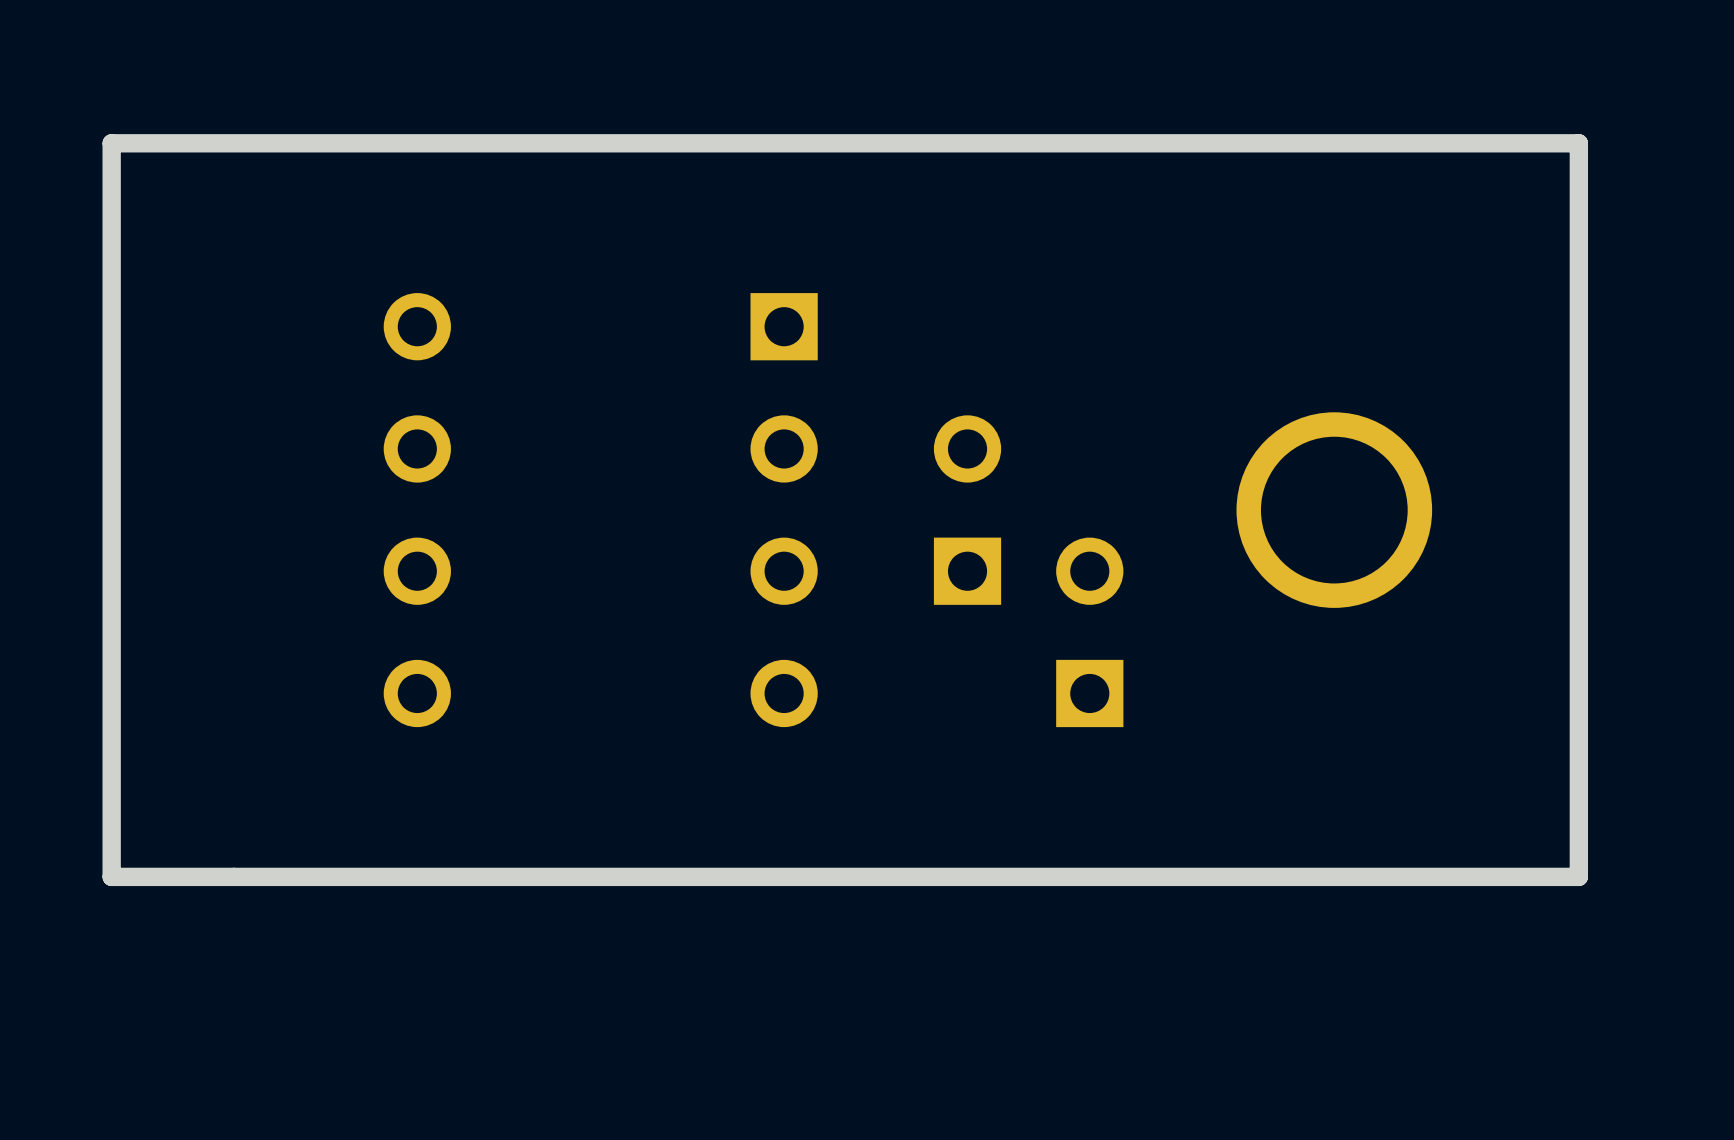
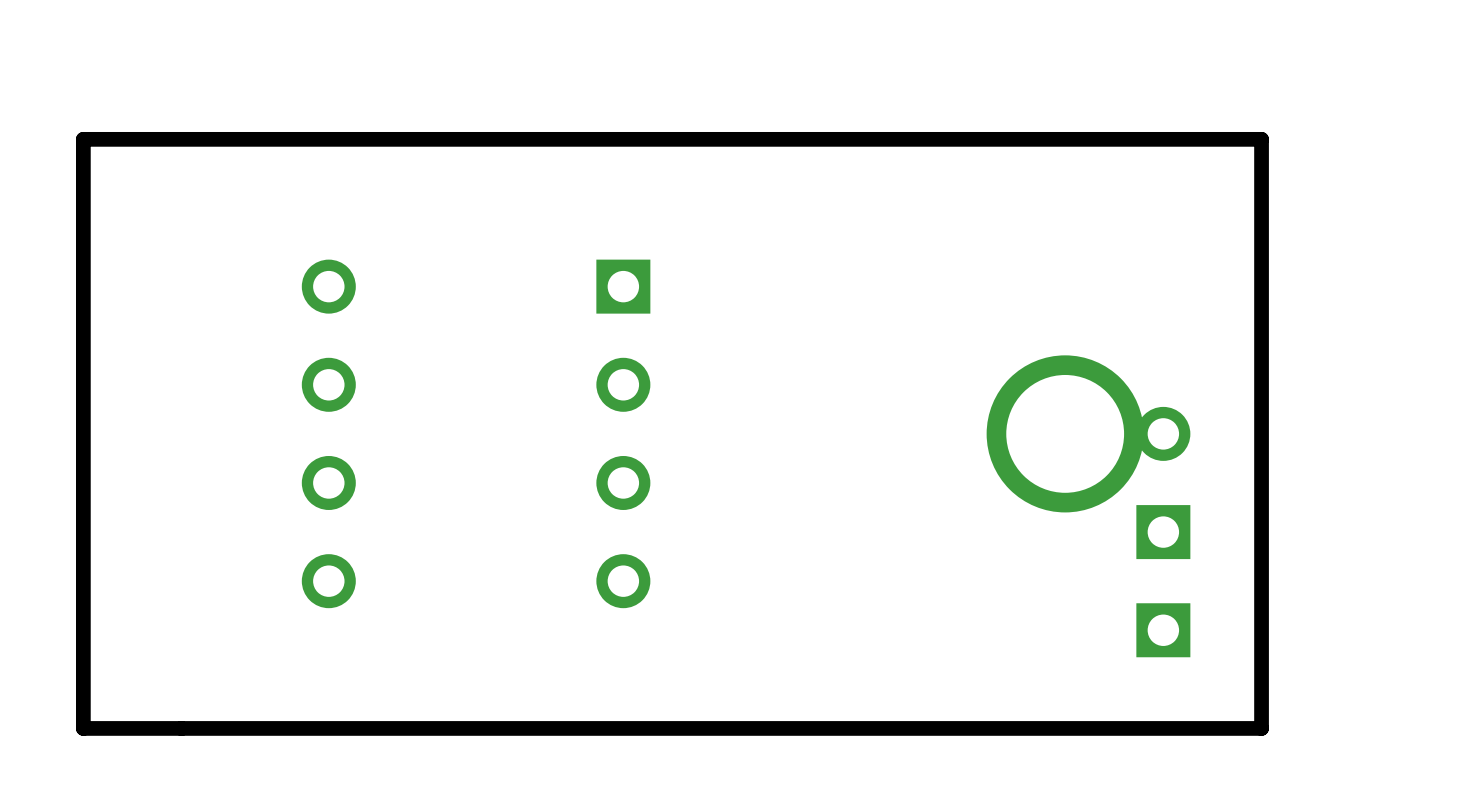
part: (967, 510) -> none
part: none -> (1163, 482)
part: (1089, 632) -> none
part: none -> (1163, 630)

